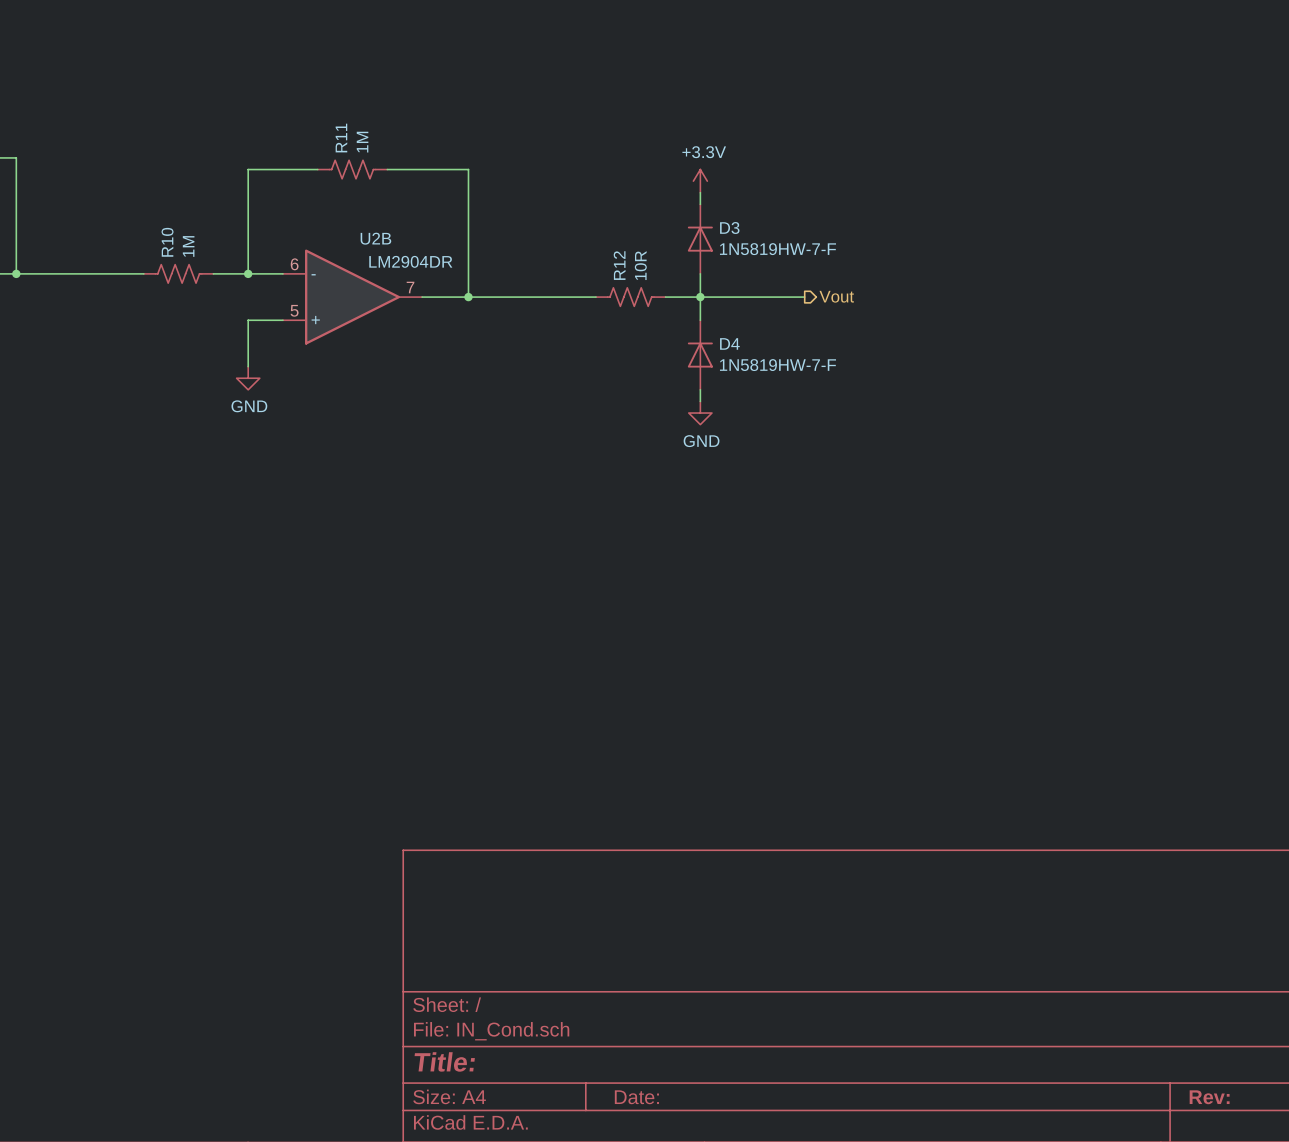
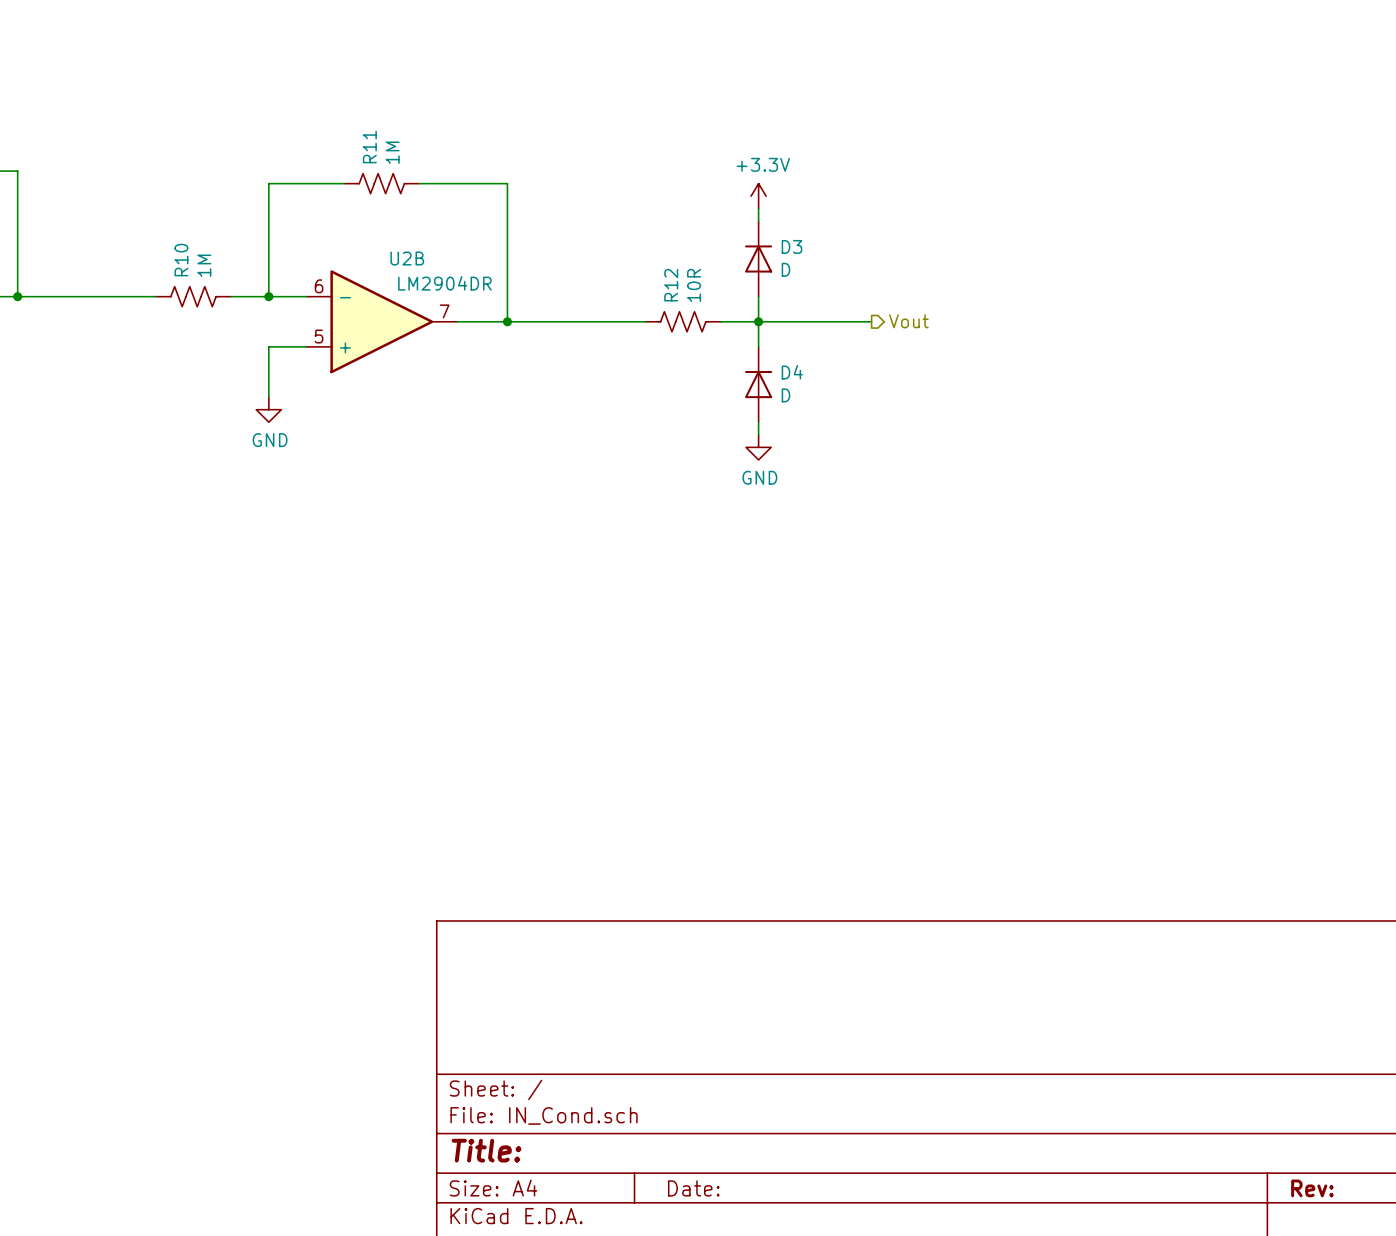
D3 value: 1N5819HW-7-F (777, 249) -> D (786, 269)
D4 value: 1N5819HW-7-F (777, 365) -> D (786, 395)

